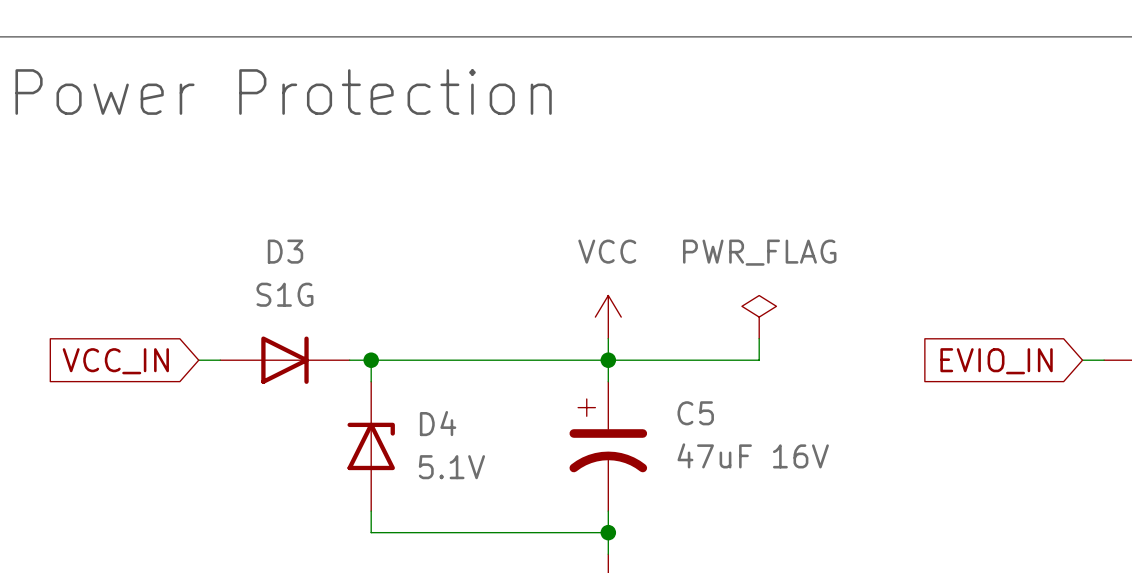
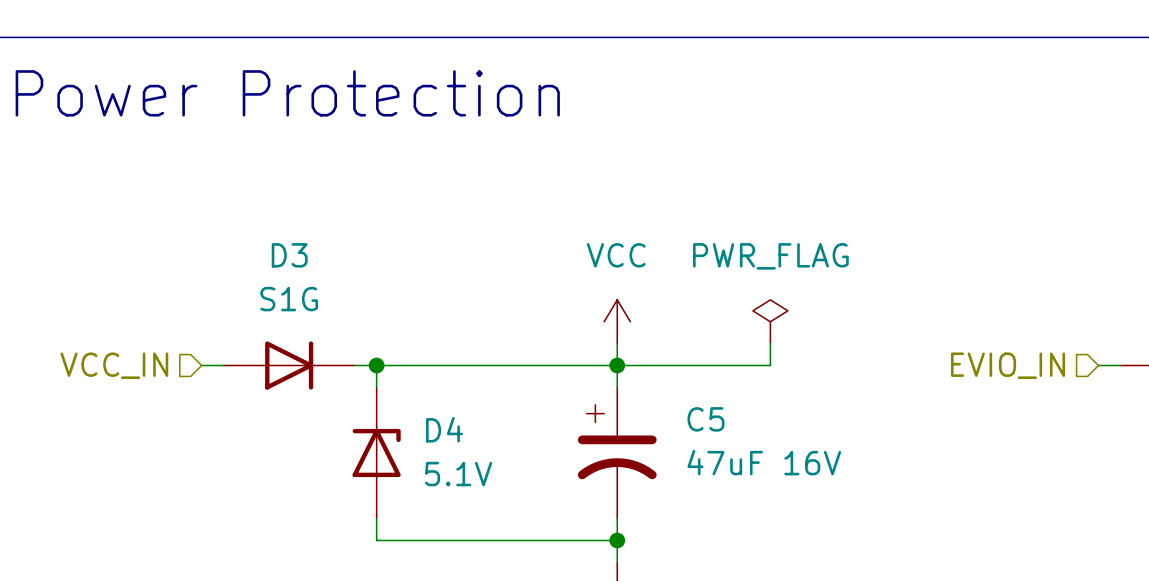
hierarchical label: none -> VCC_IN (114, 365)
hierarchical label: none -> EVIO_IN (1008, 365)
global label: VCC_IN (115, 361) -> none
global label: EVIO_IN (996, 361) -> none

